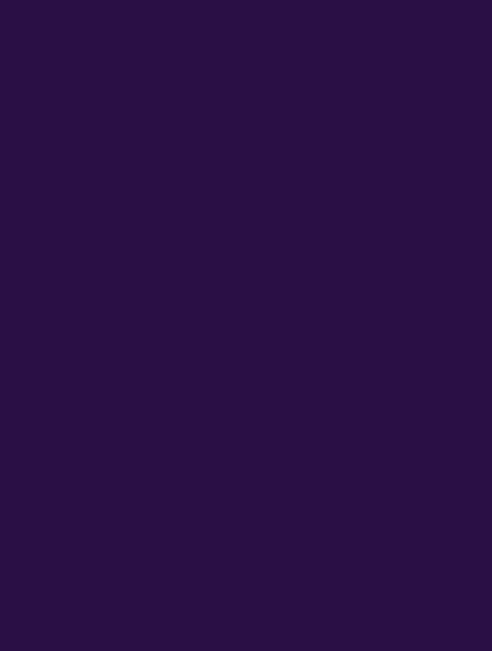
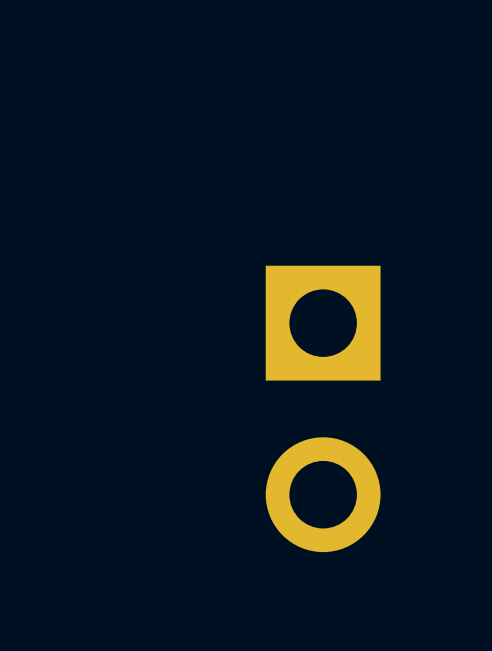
part: none -> (323, 408)

